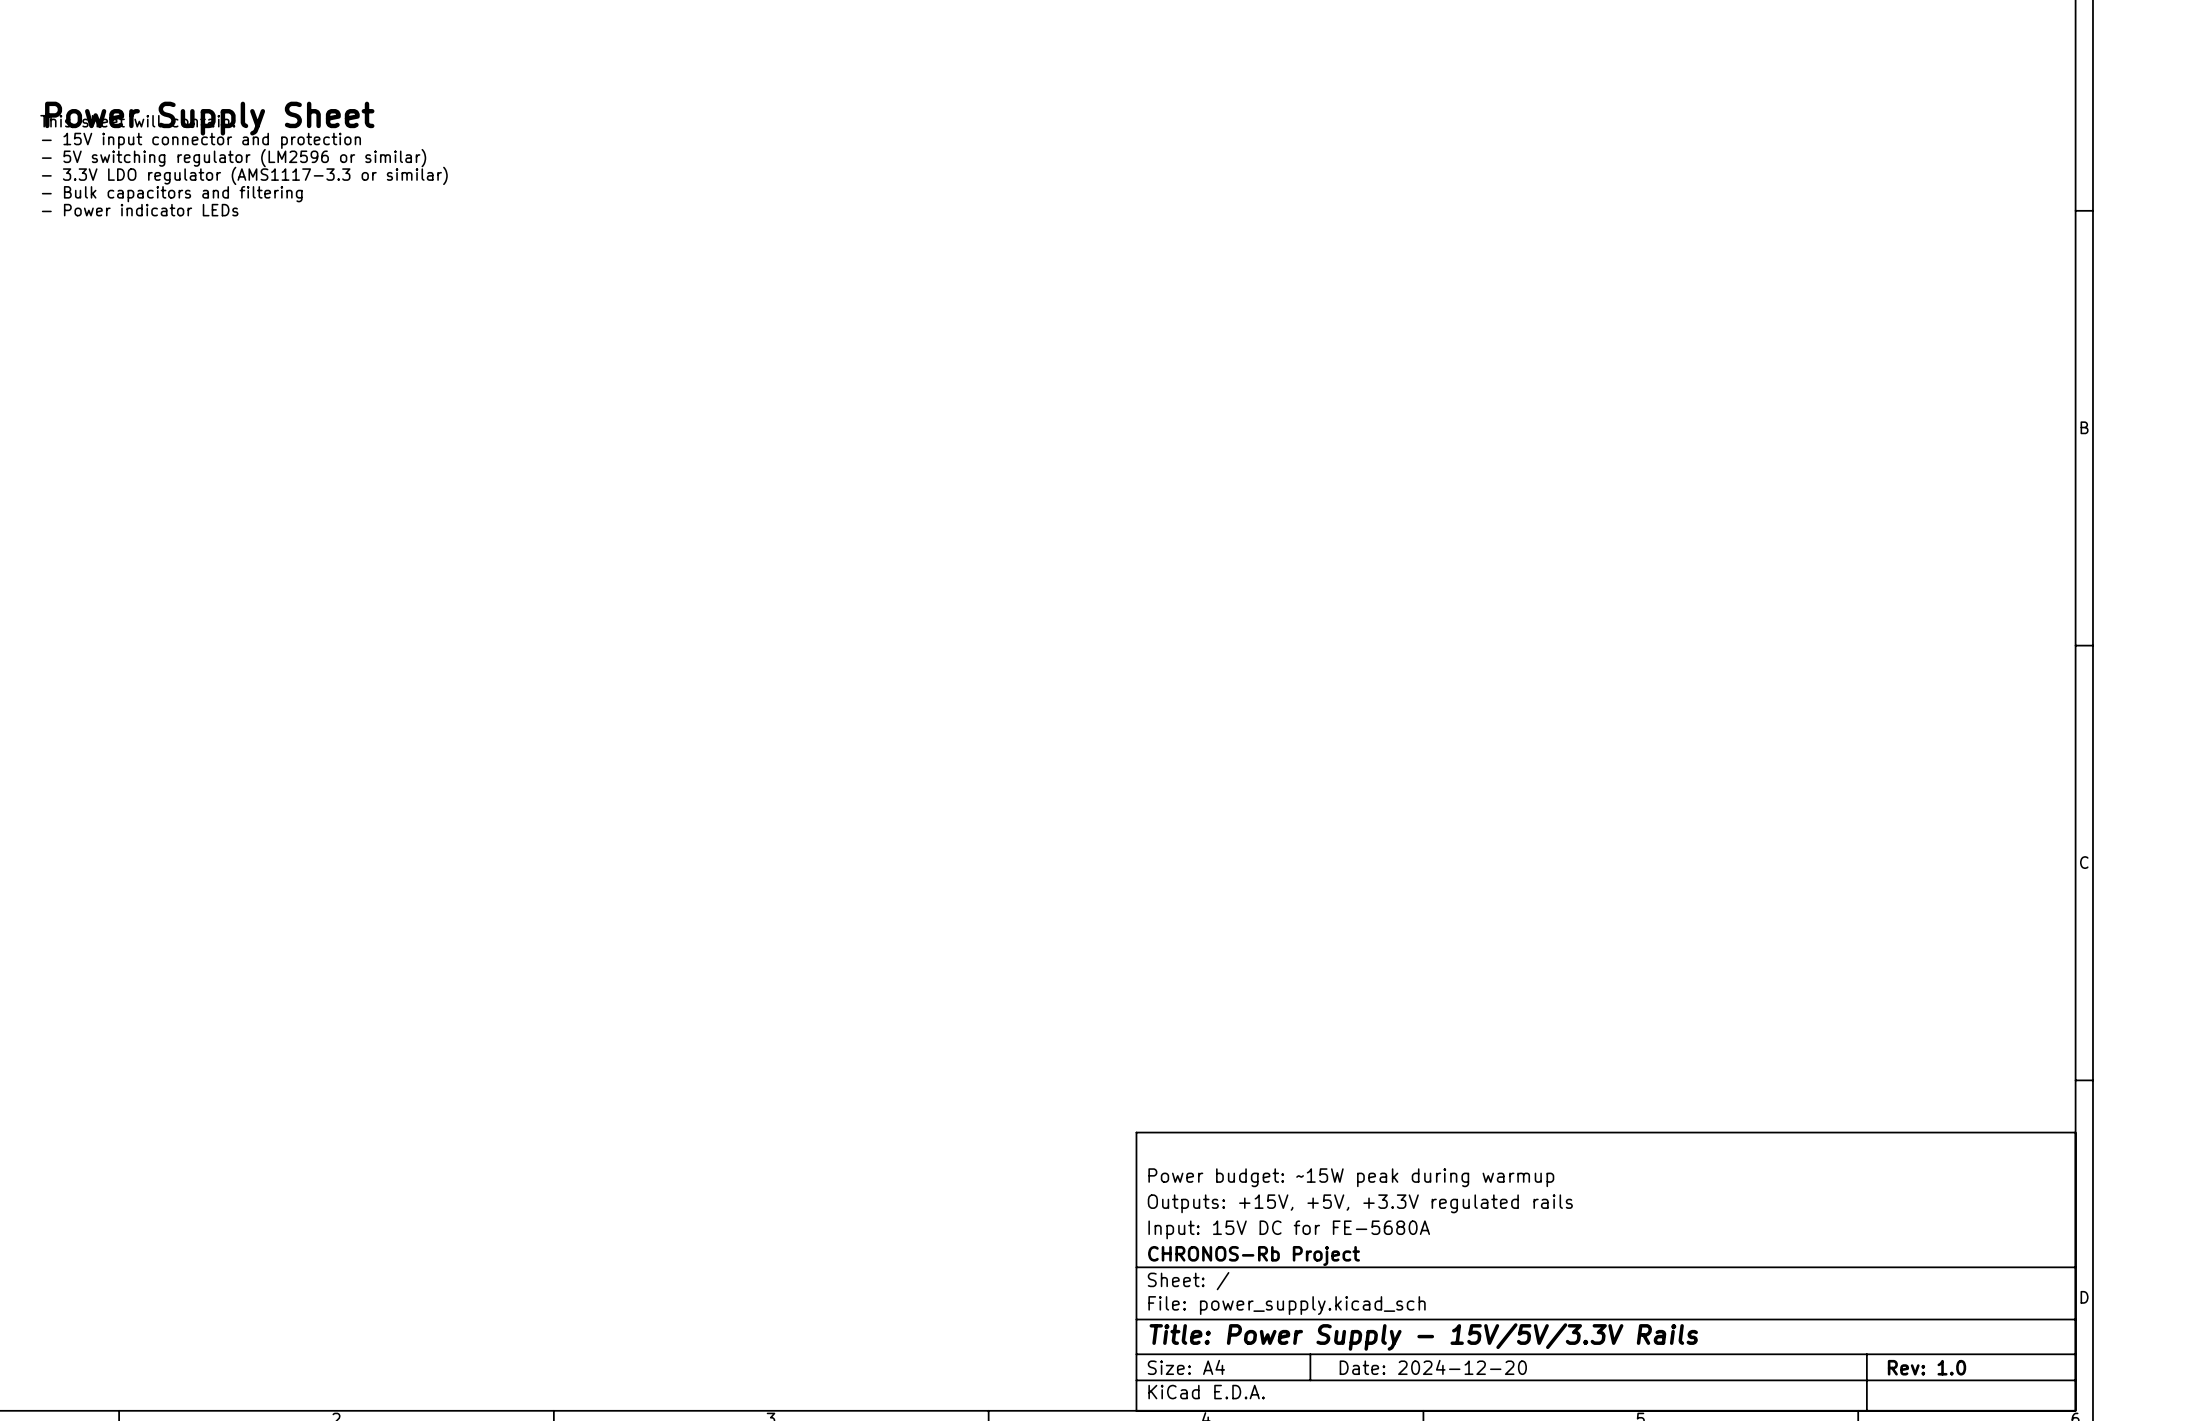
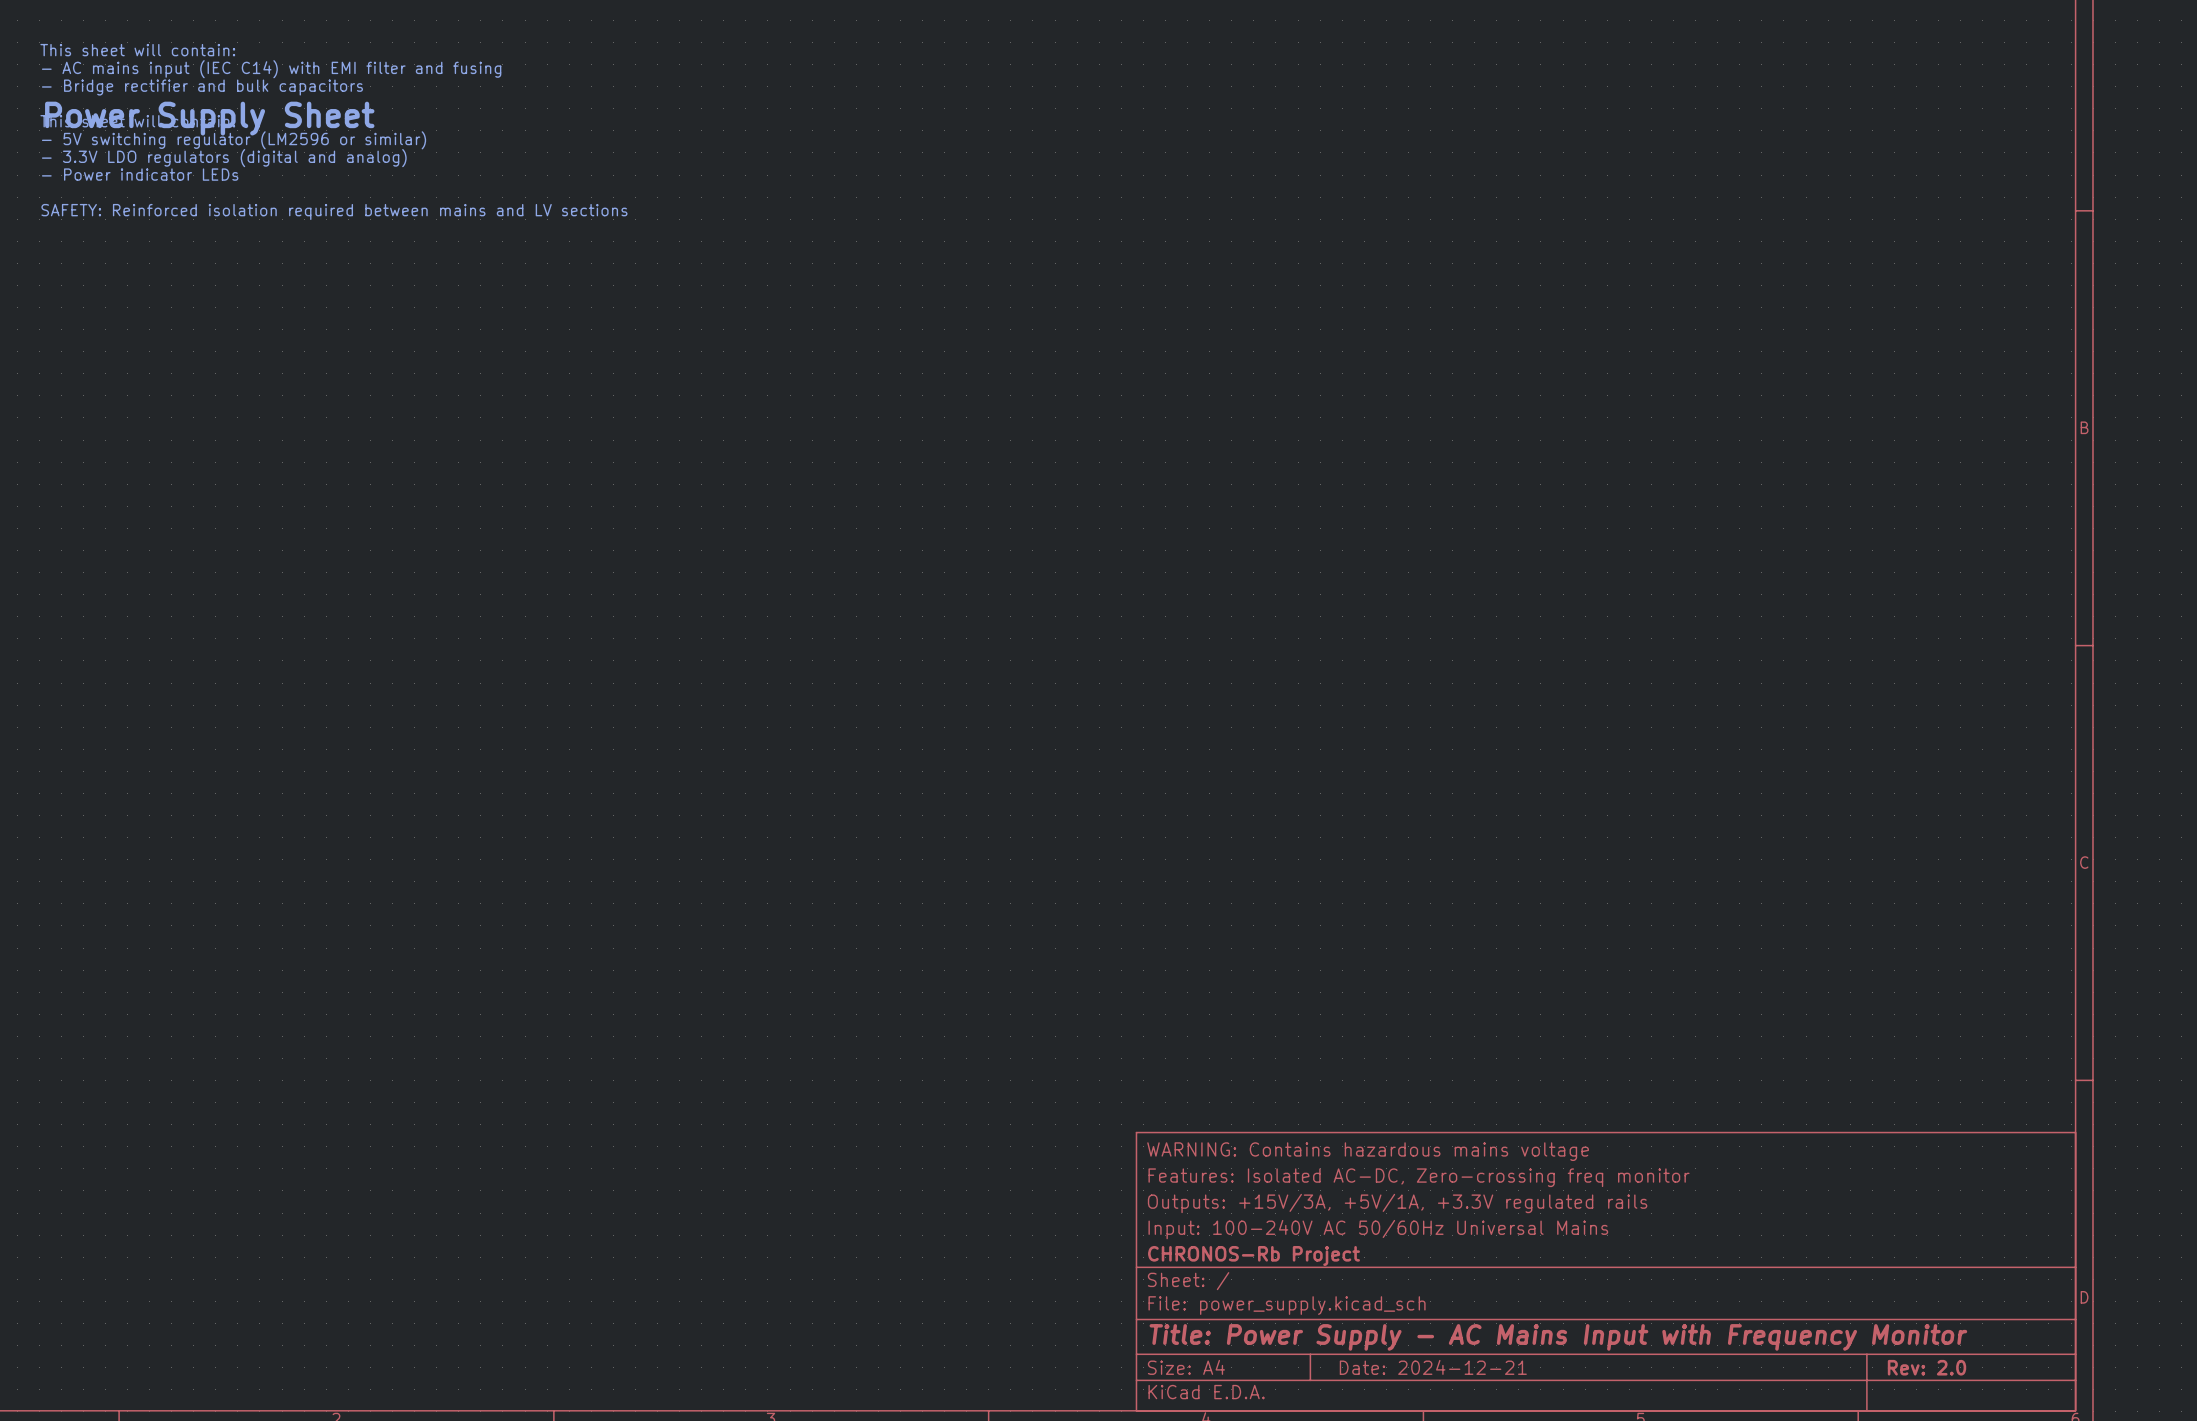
text: none -> This sheet will contain: (137, 50)
text: none -> - AC mains input (IEC C14) with EMI filter and fusing (271, 69)
text: none -> - Bridge rectifier and bulk capacitors (202, 87)
text: - 15V input connector and protection (201, 140) -> - 5V switching regulator (LM2596 or similar) (234, 140)
text: - 5V switching regulator (LM2596 or similar) (234, 158) -> - 3.3V LDO regulators (digital and analog) (224, 158)
text: - 3.3V LDO regulator (AMS1117-3.3 or similar) (244, 175) -> - Power indicator LEDs (140, 174)
text: - Bulk capacitors and filtering (172, 194) -> none
text: - Power indicator LEDs (140, 210) -> SAFETY: Reinforced isolation required between mains and LV sections (334, 211)
title block: none -> WARNING: Contains hazardous mains voltage (1368, 1151)
title block: Power budget: ~15W peak during warmup (1351, 1177) -> Features: Isolated AC-DC, Zero-crossing freq monitor (1419, 1177)
title block: Outputs: +15V, +5V, +3.3V regulated rails (1360, 1203) -> Outputs: +15V/3A, +5V/1A, +3.3V regulated rails (1397, 1203)
title block: Input: 15V DC for FE-5680A (1289, 1229) -> Input: 100-240V AC 50/60Hz Universal Mains (1378, 1229)
title block: Title: Power Supply - 15V/5V/3.3V Rails (1423, 1336) -> Title: Power Supply - AC Mains Input with Frequency Monitor (1558, 1337)
title block: Date: 2024-12-20 (1433, 1367) -> Date: 2024-12-21 (1433, 1367)
title block: Rev: 1.0 (1927, 1367) -> Rev: 2.0 (1927, 1367)

